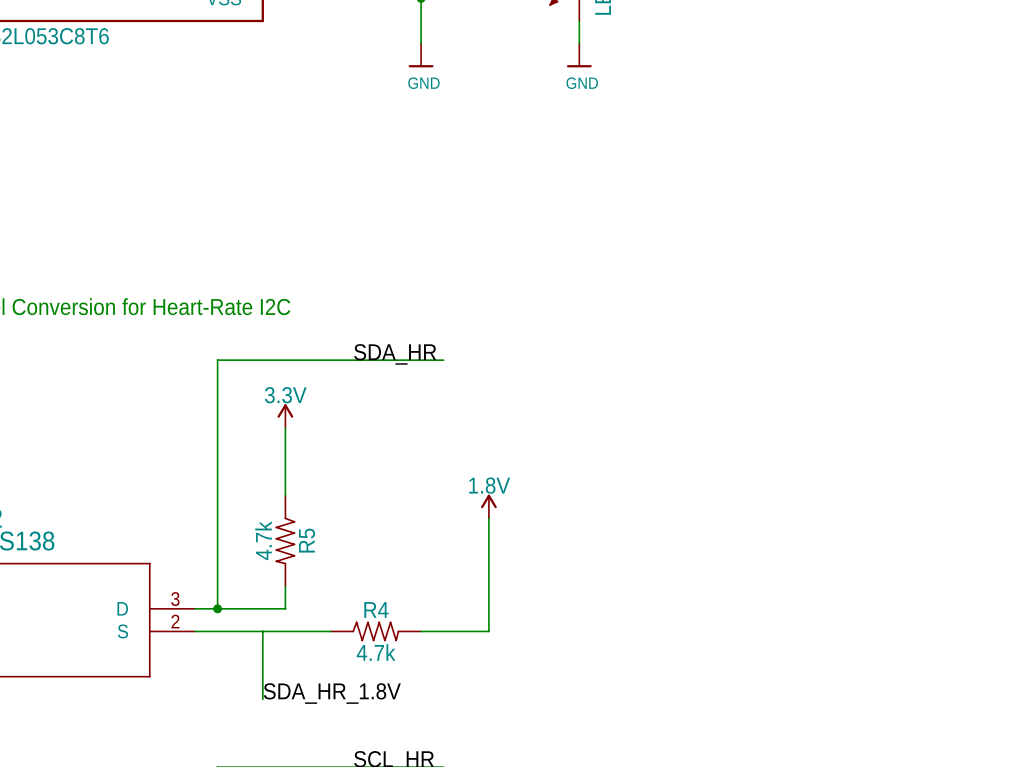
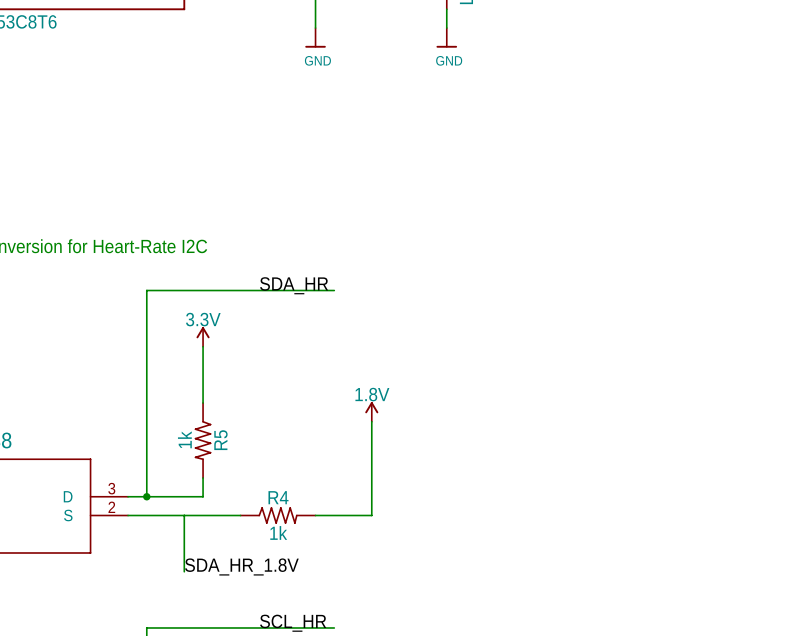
R5 value: 4.7k (263, 540) -> 1k (184, 439)
R4 value: 4.7k (376, 652) -> 1k (278, 532)

